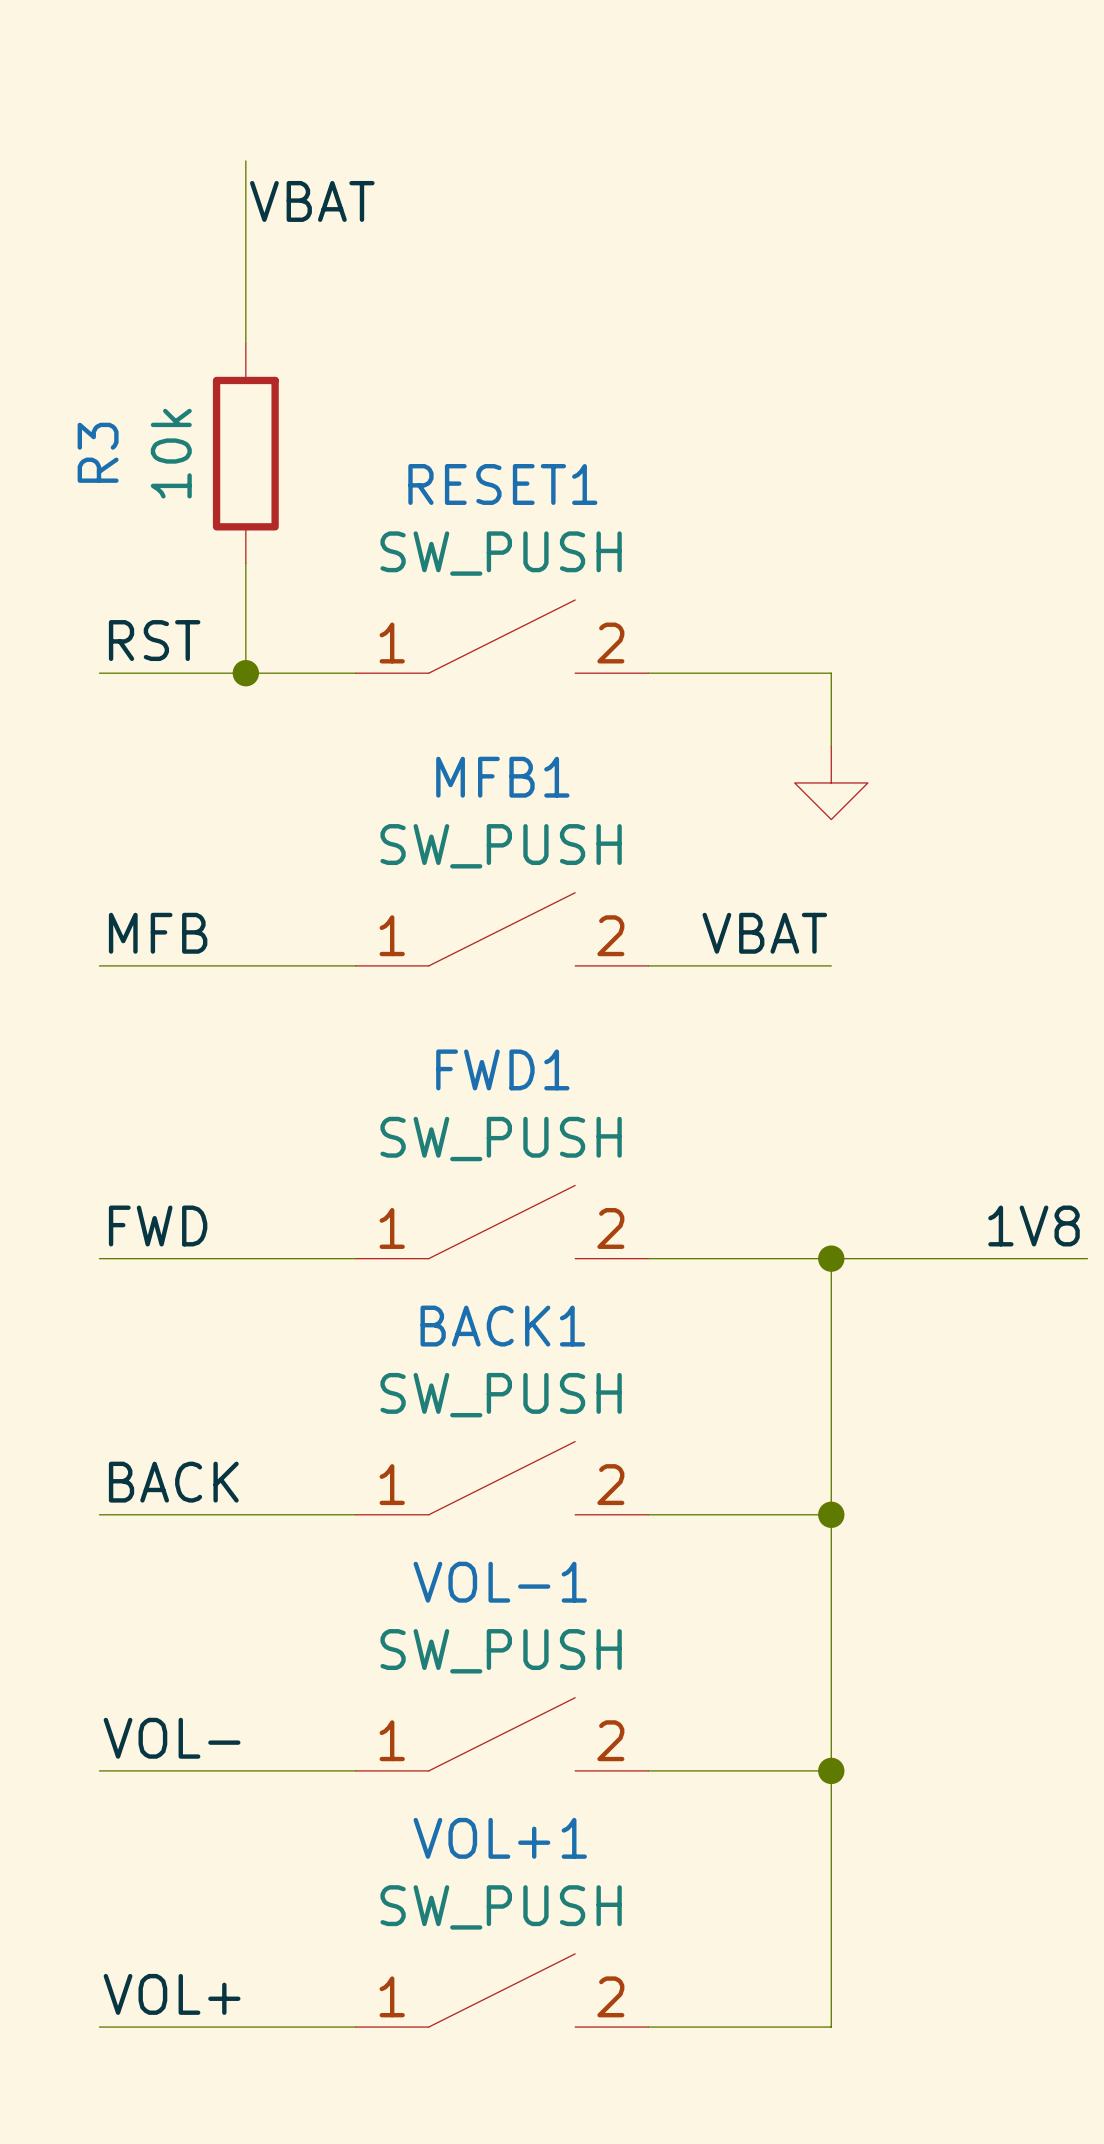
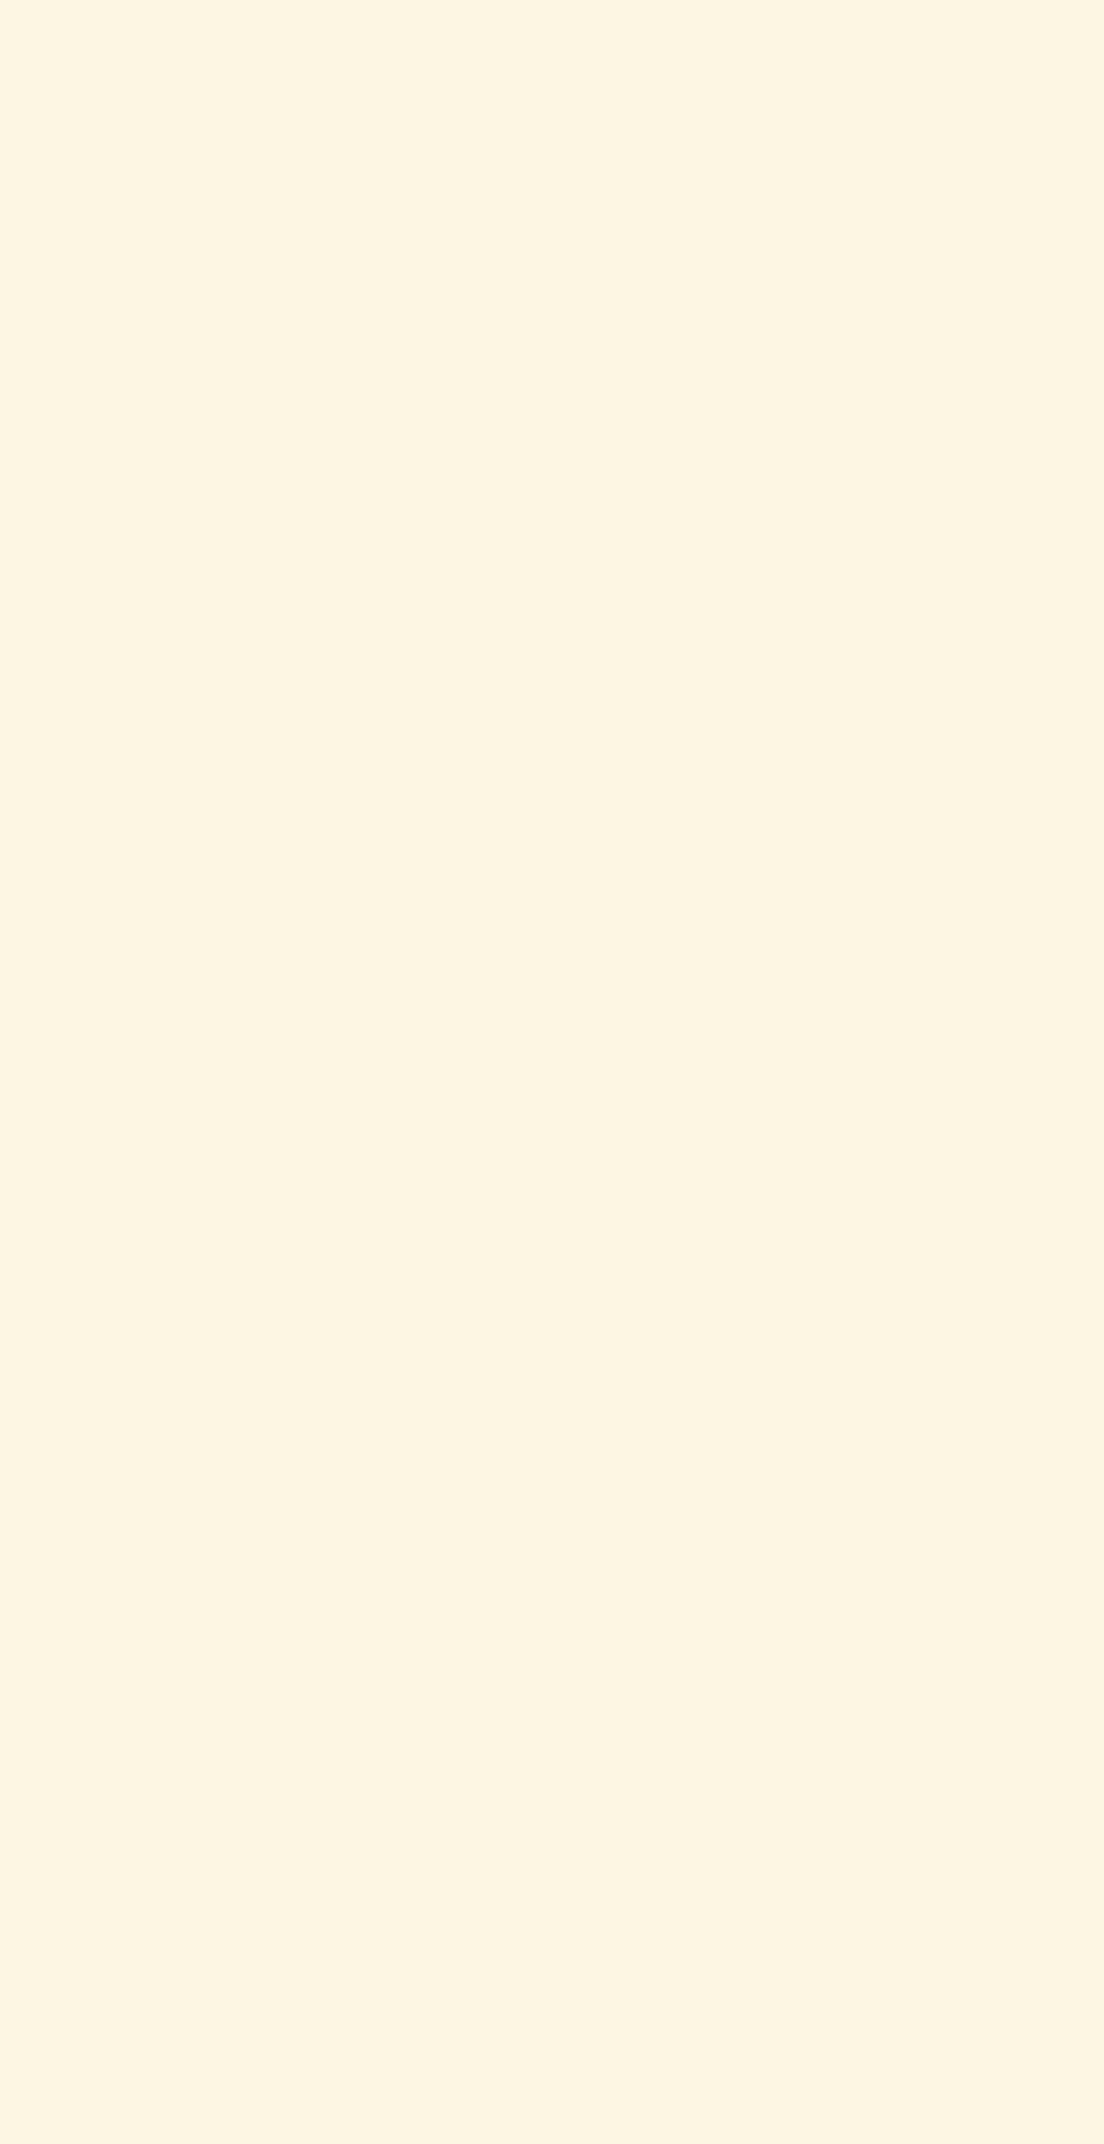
wire: (245, 160) (245, 343) -> none
label: VBAT (312, 201) -> none
R3: 10k (245, 453) -> none
wire: (245, 563) (245, 673) -> none
RESET1: SW_PUSH (501, 636) -> none
label: RST (154, 640) -> none
wire: (99, 673) (355, 673) -> none
junction: (245, 673) -> none
wire: (648, 673) (831, 673) (831, 746) -> none
power symbol: (831, 782) -> none
MFB1: SW_PUSH (501, 929) -> none
label: MFB (158, 933) -> none
label: VBAT (764, 933) -> none
wire: (99, 965) (355, 965) -> none
wire: (648, 965) (831, 965) -> none
FWD1: SW_PUSH (501, 1222) -> none
label: FWD (158, 1225) -> none
label: 1V8 (1034, 1225) -> none
wire: (99, 1258) (355, 1258) -> none
wire: (648, 1258) (1087, 1258) -> none
wire: (831, 1258) (831, 2027) (648, 2027) -> none
junction: (831, 1258) -> none
BACK1: SW_PUSH (501, 1478) -> none
label: BACK (173, 1482) -> none
wire: (99, 1514) (355, 1514) -> none
wire: (648, 1514) (831, 1514) -> none
junction: (831, 1514) -> none
VOL-1: SW_PUSH (501, 1734) -> none
label: VOL- (172, 1738) -> none
wire: (99, 1770) (355, 1770) -> none
wire: (648, 1770) (831, 1770) -> none
junction: (831, 1770) -> none
VOL+1: SW_PUSH (501, 1990) -> none
label: VOL+ (172, 1994) -> none
wire: (99, 2027) (355, 2027) -> none

